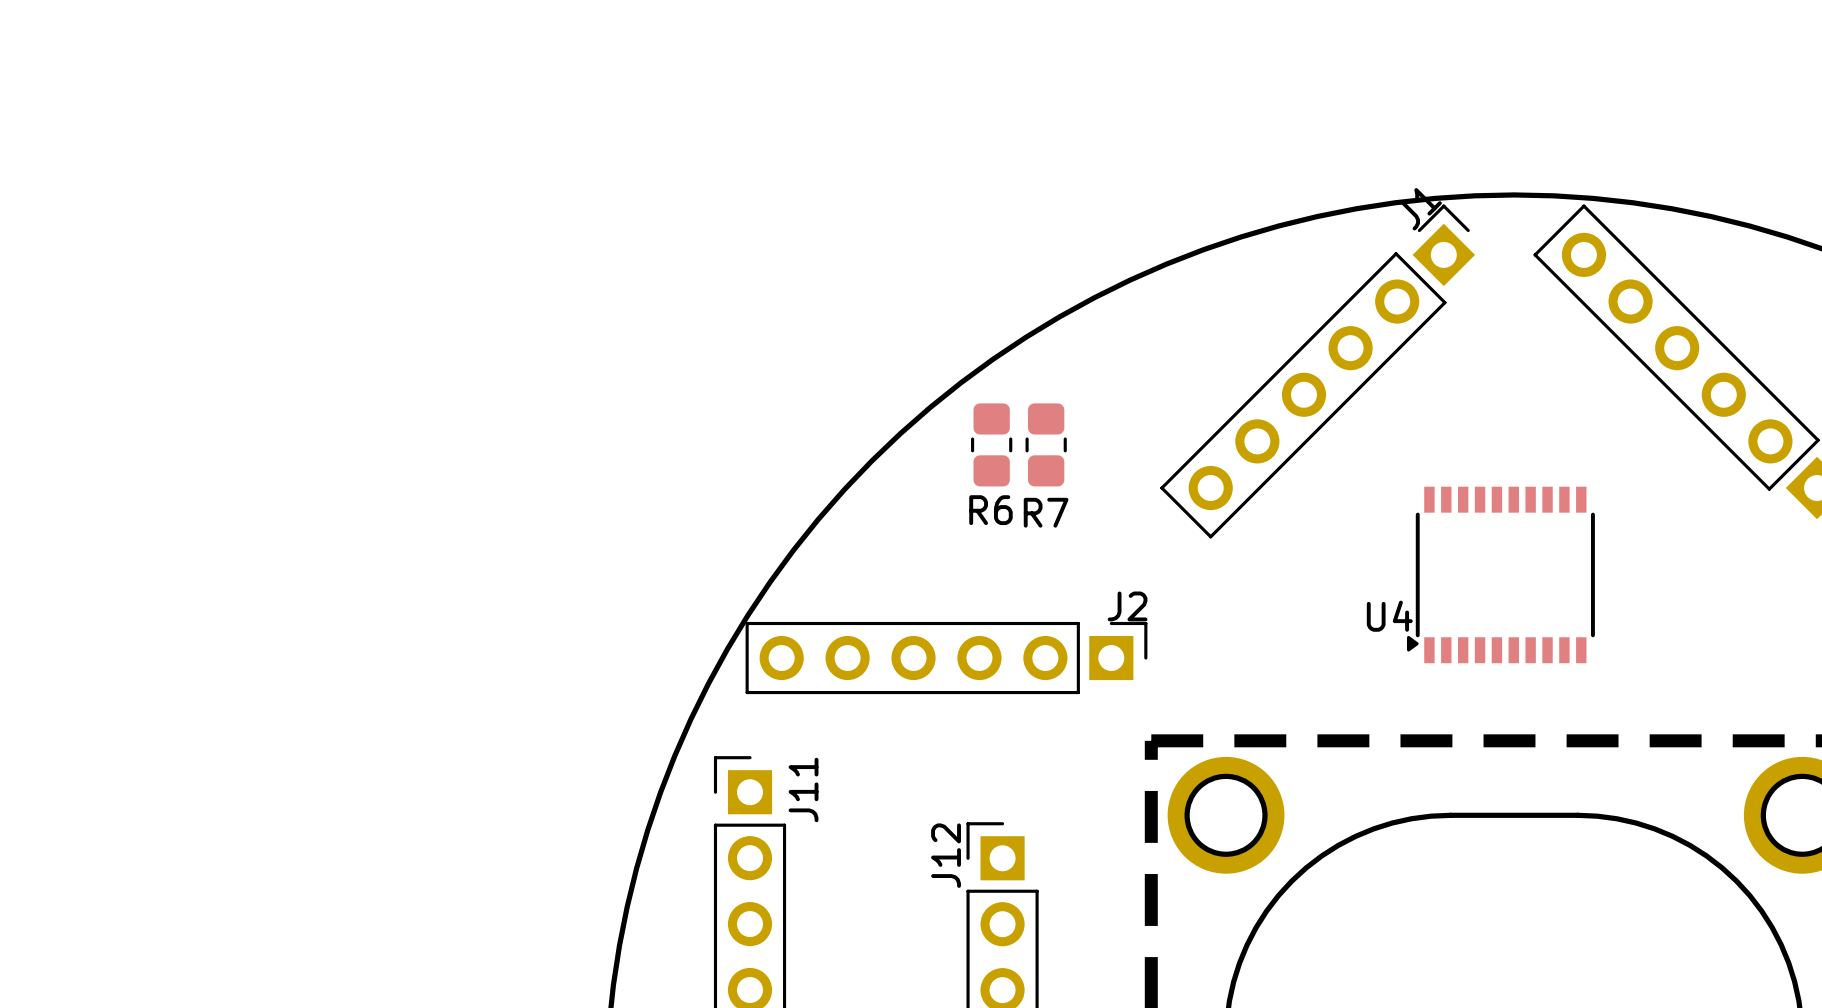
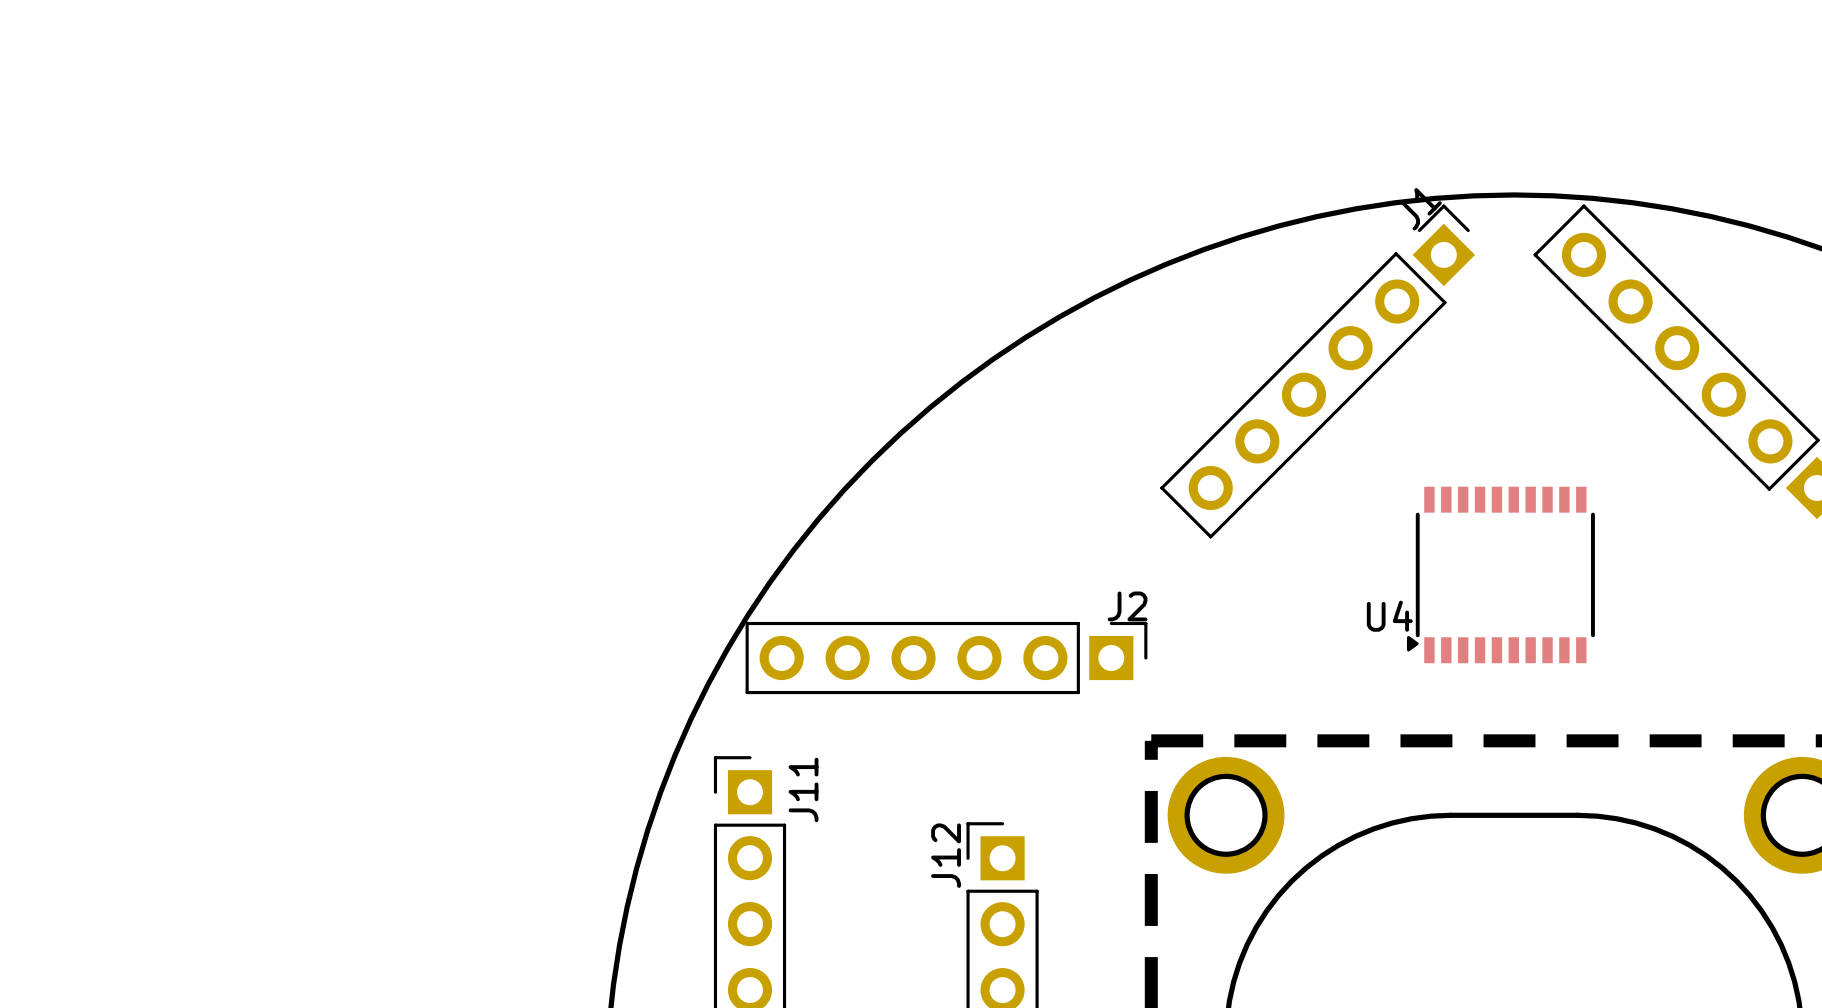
R6: (991, 444) -> none
R7: (1046, 444) -> none

